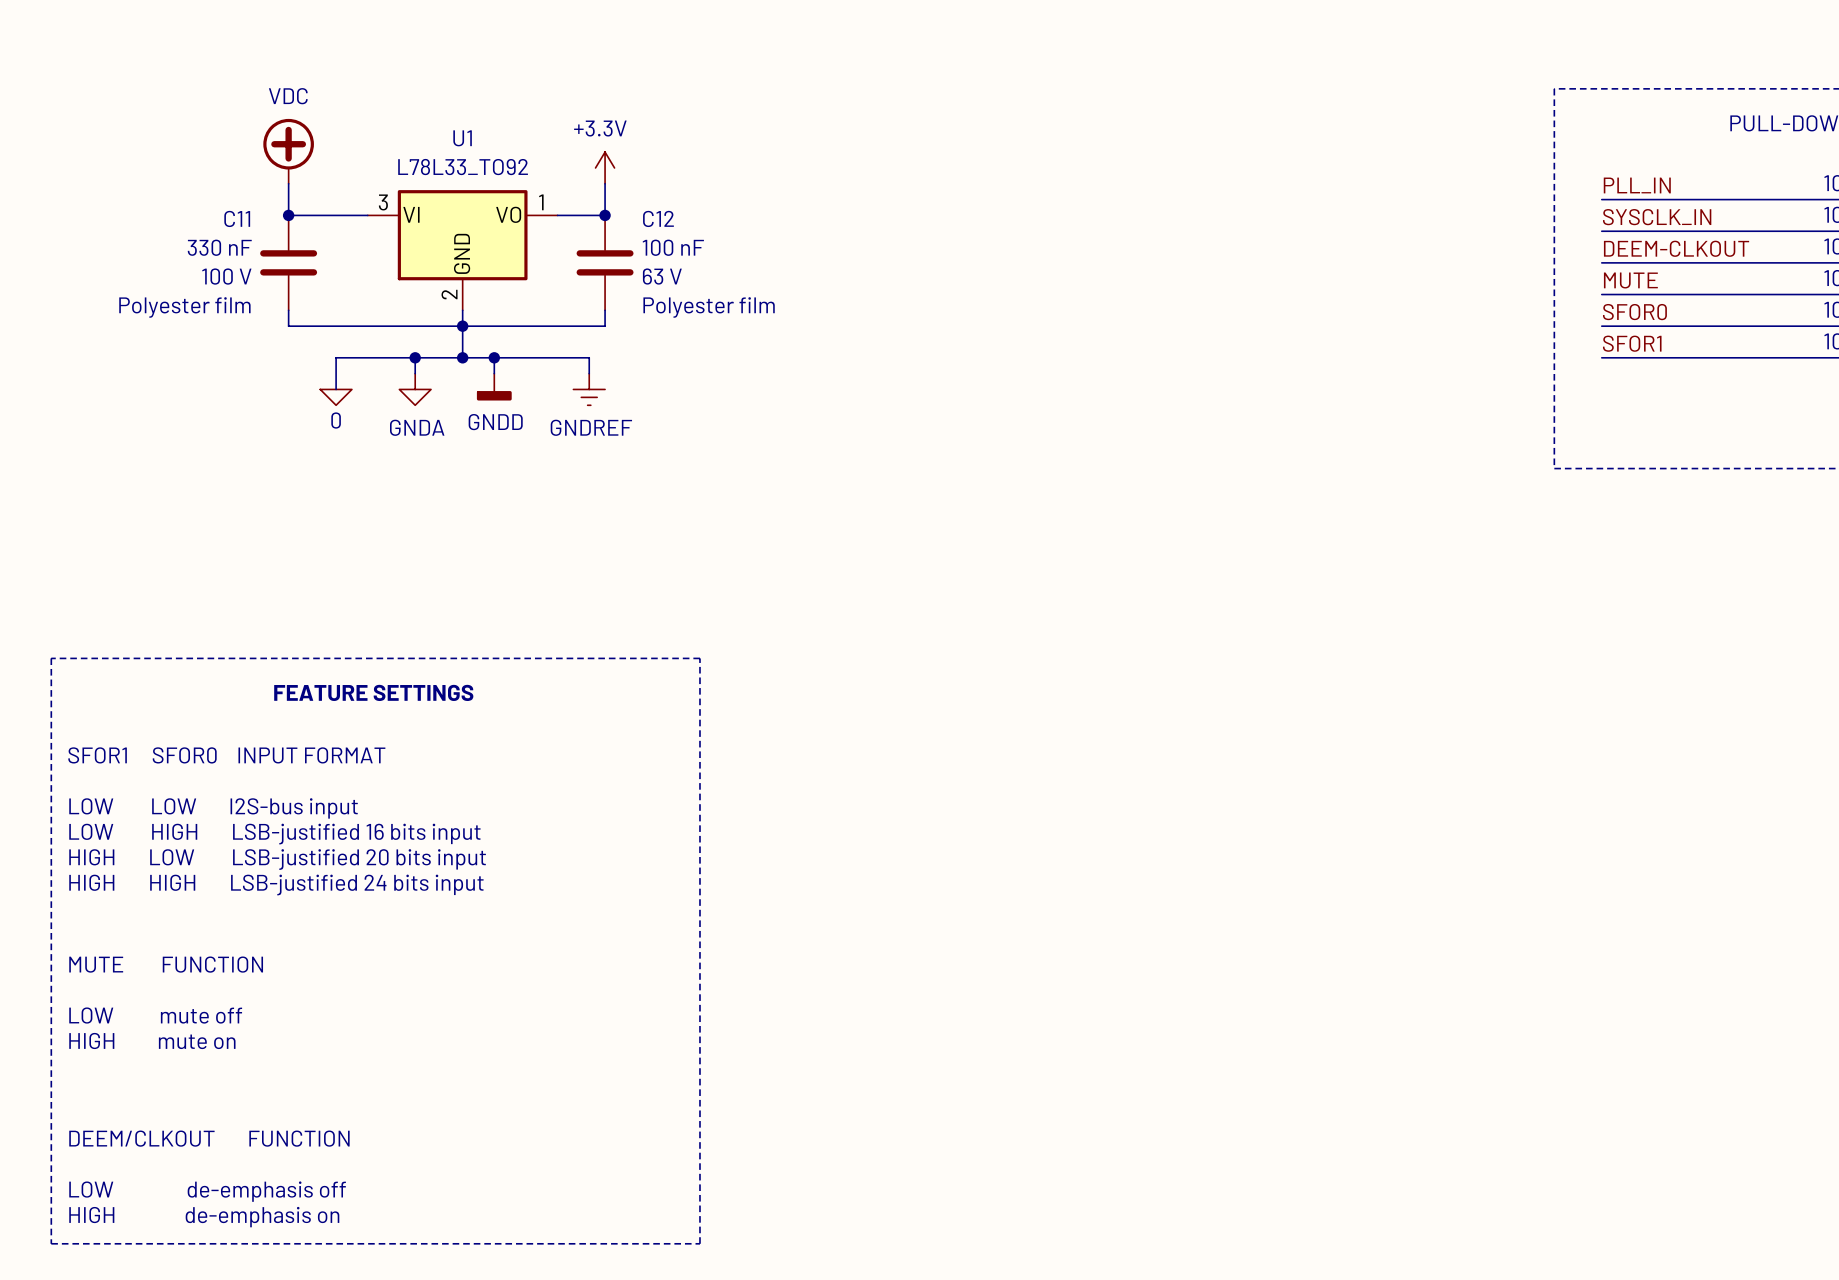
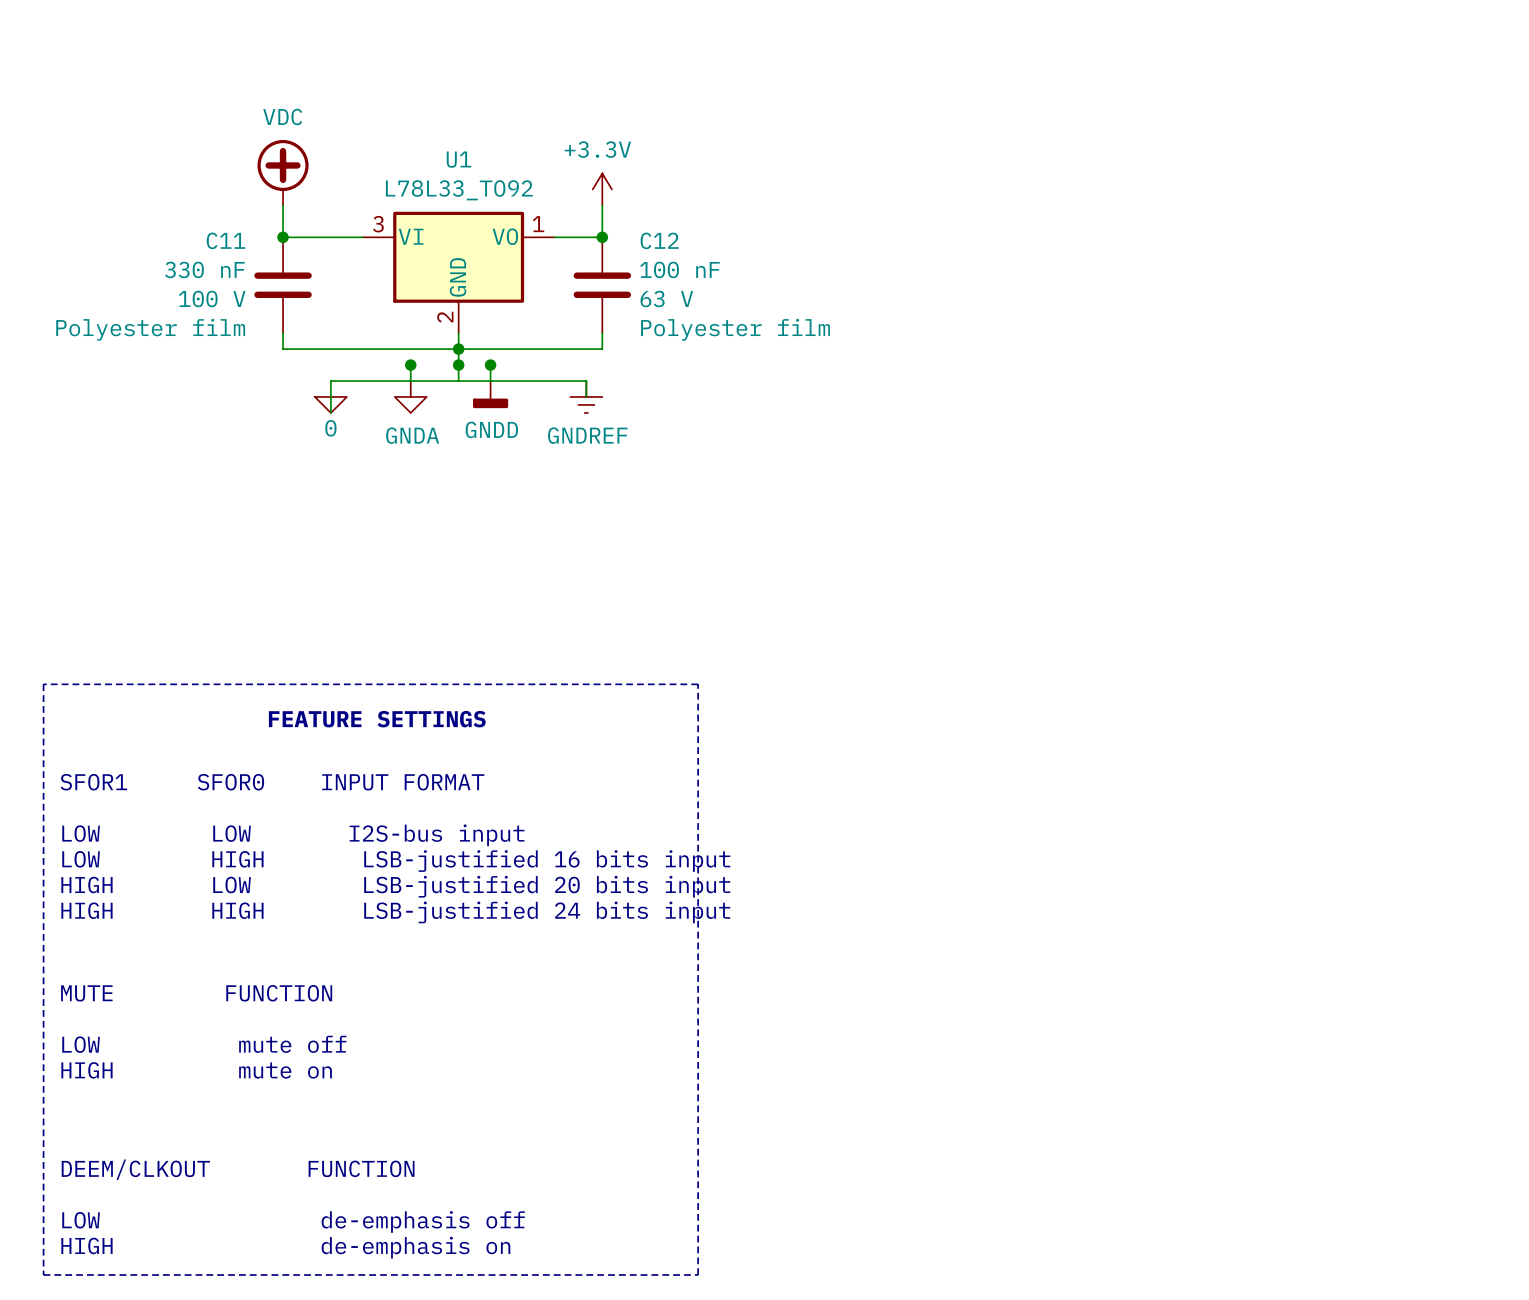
junction position: (415, 357) -> (410, 365)
junction position: (462, 357) -> (458, 365)
junction position: (494, 357) -> (490, 365)
power symbol position: GNDD (494, 387) -> GNDD (490, 394)
power symbol position: GNDA (415, 389) -> GNDA (410, 396)
power symbol position: GNDREF (589, 389) -> GNDREF (586, 396)
power symbol position: 0 (336, 397) -> 0 (330, 404)

